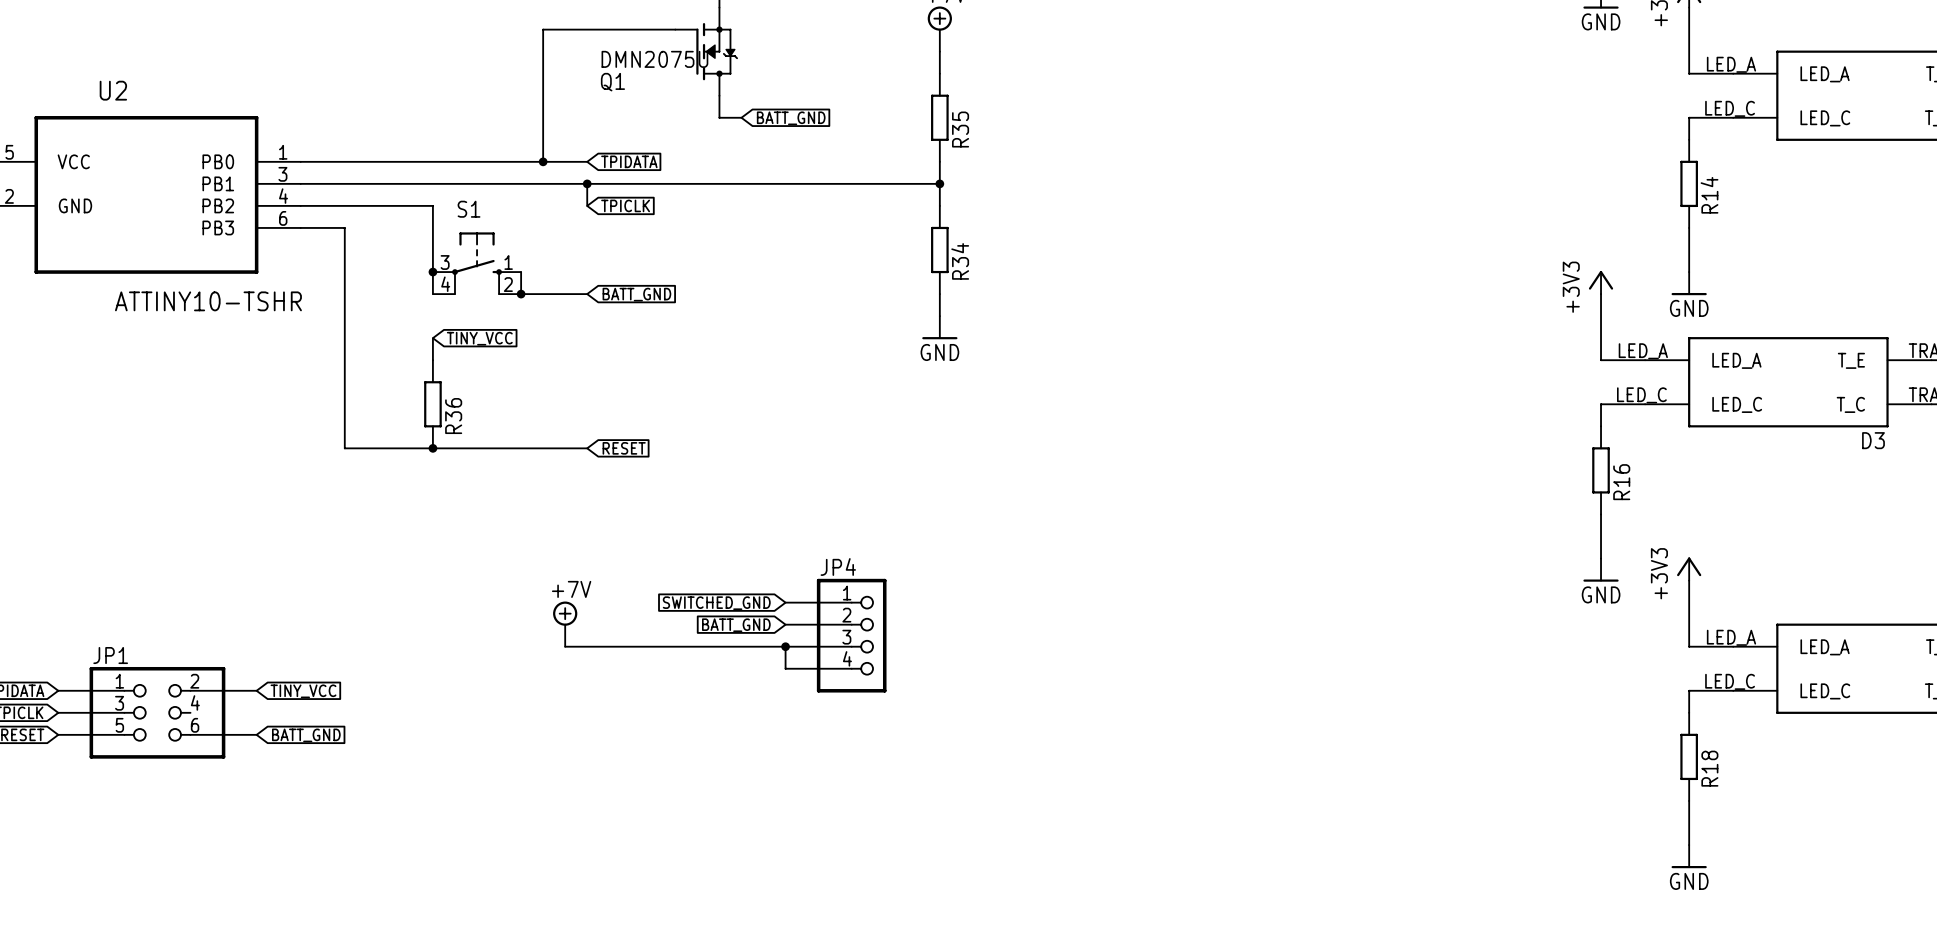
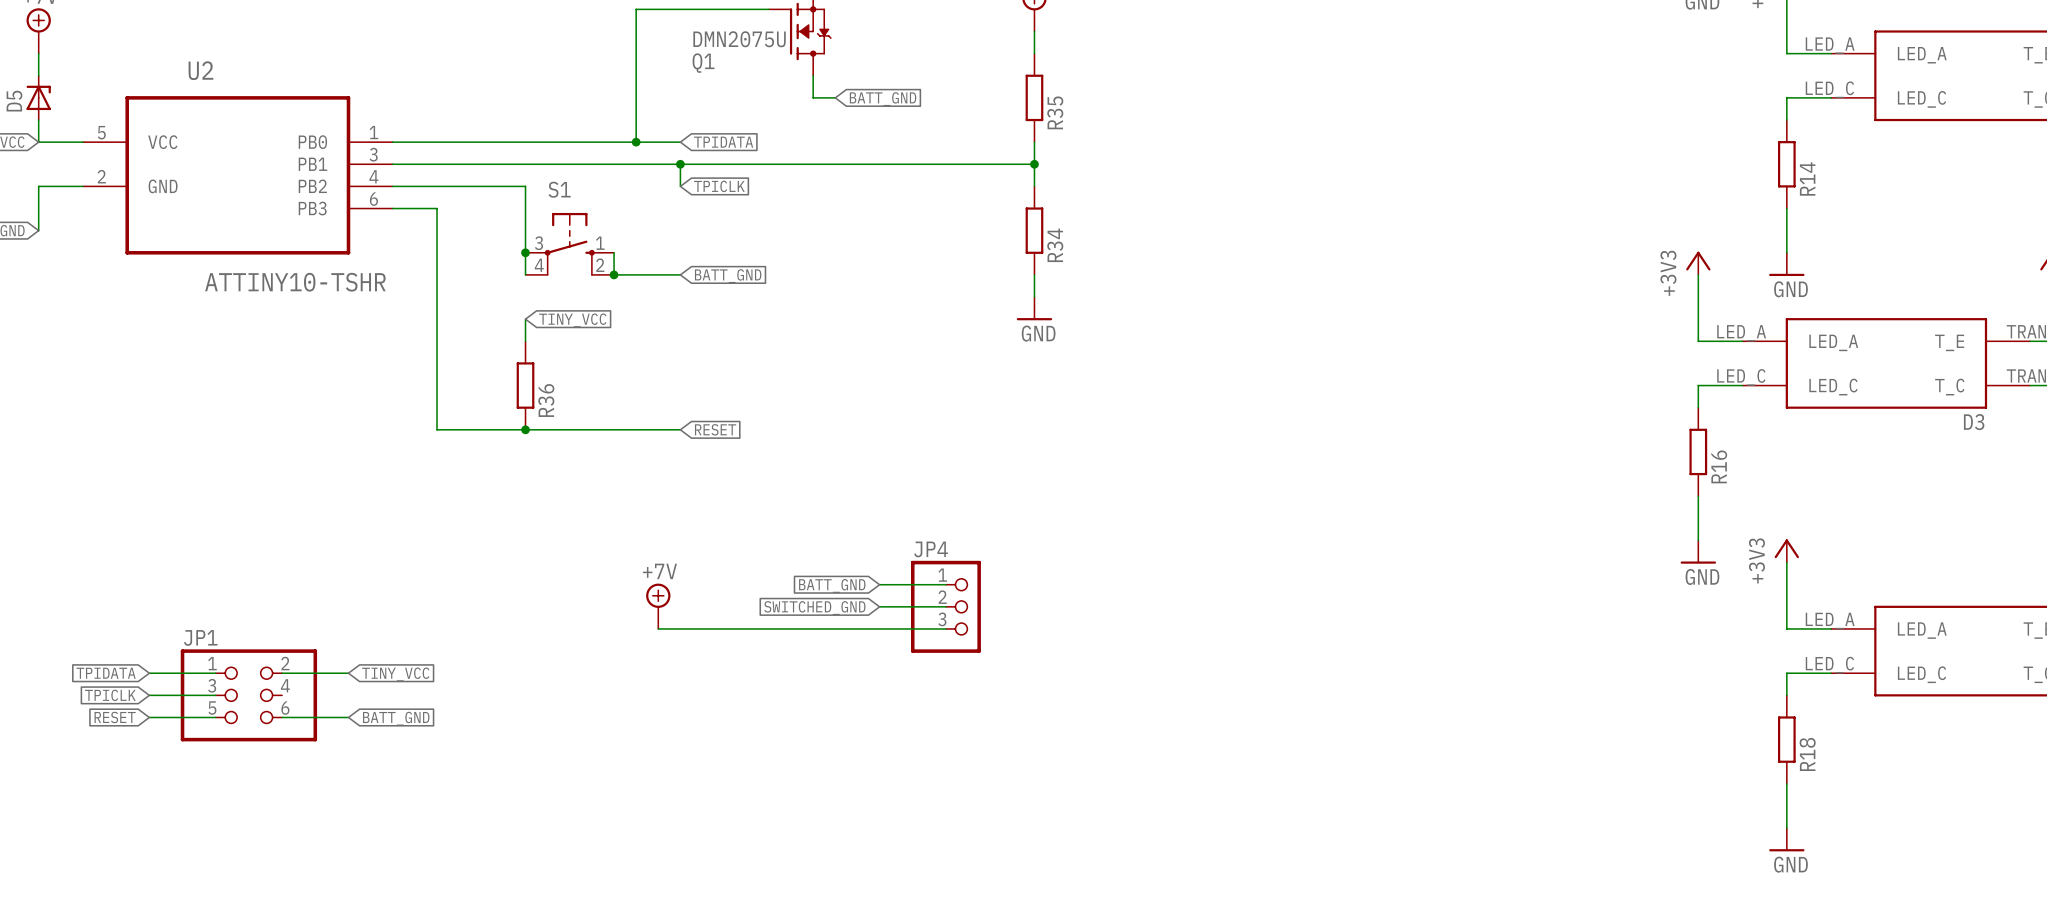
JP4 symbol: [816, 578, 887, 693] -> [910, 560, 981, 653]
global label: SWITCHED_GND (716, 603) -> BATT_GND (832, 585)
global label: BATT_GND (736, 625) -> SWITCHED_GND (814, 608)
wire: (785, 646) (785, 668) (851, 668) -> none
junction: (785, 646) -> none

